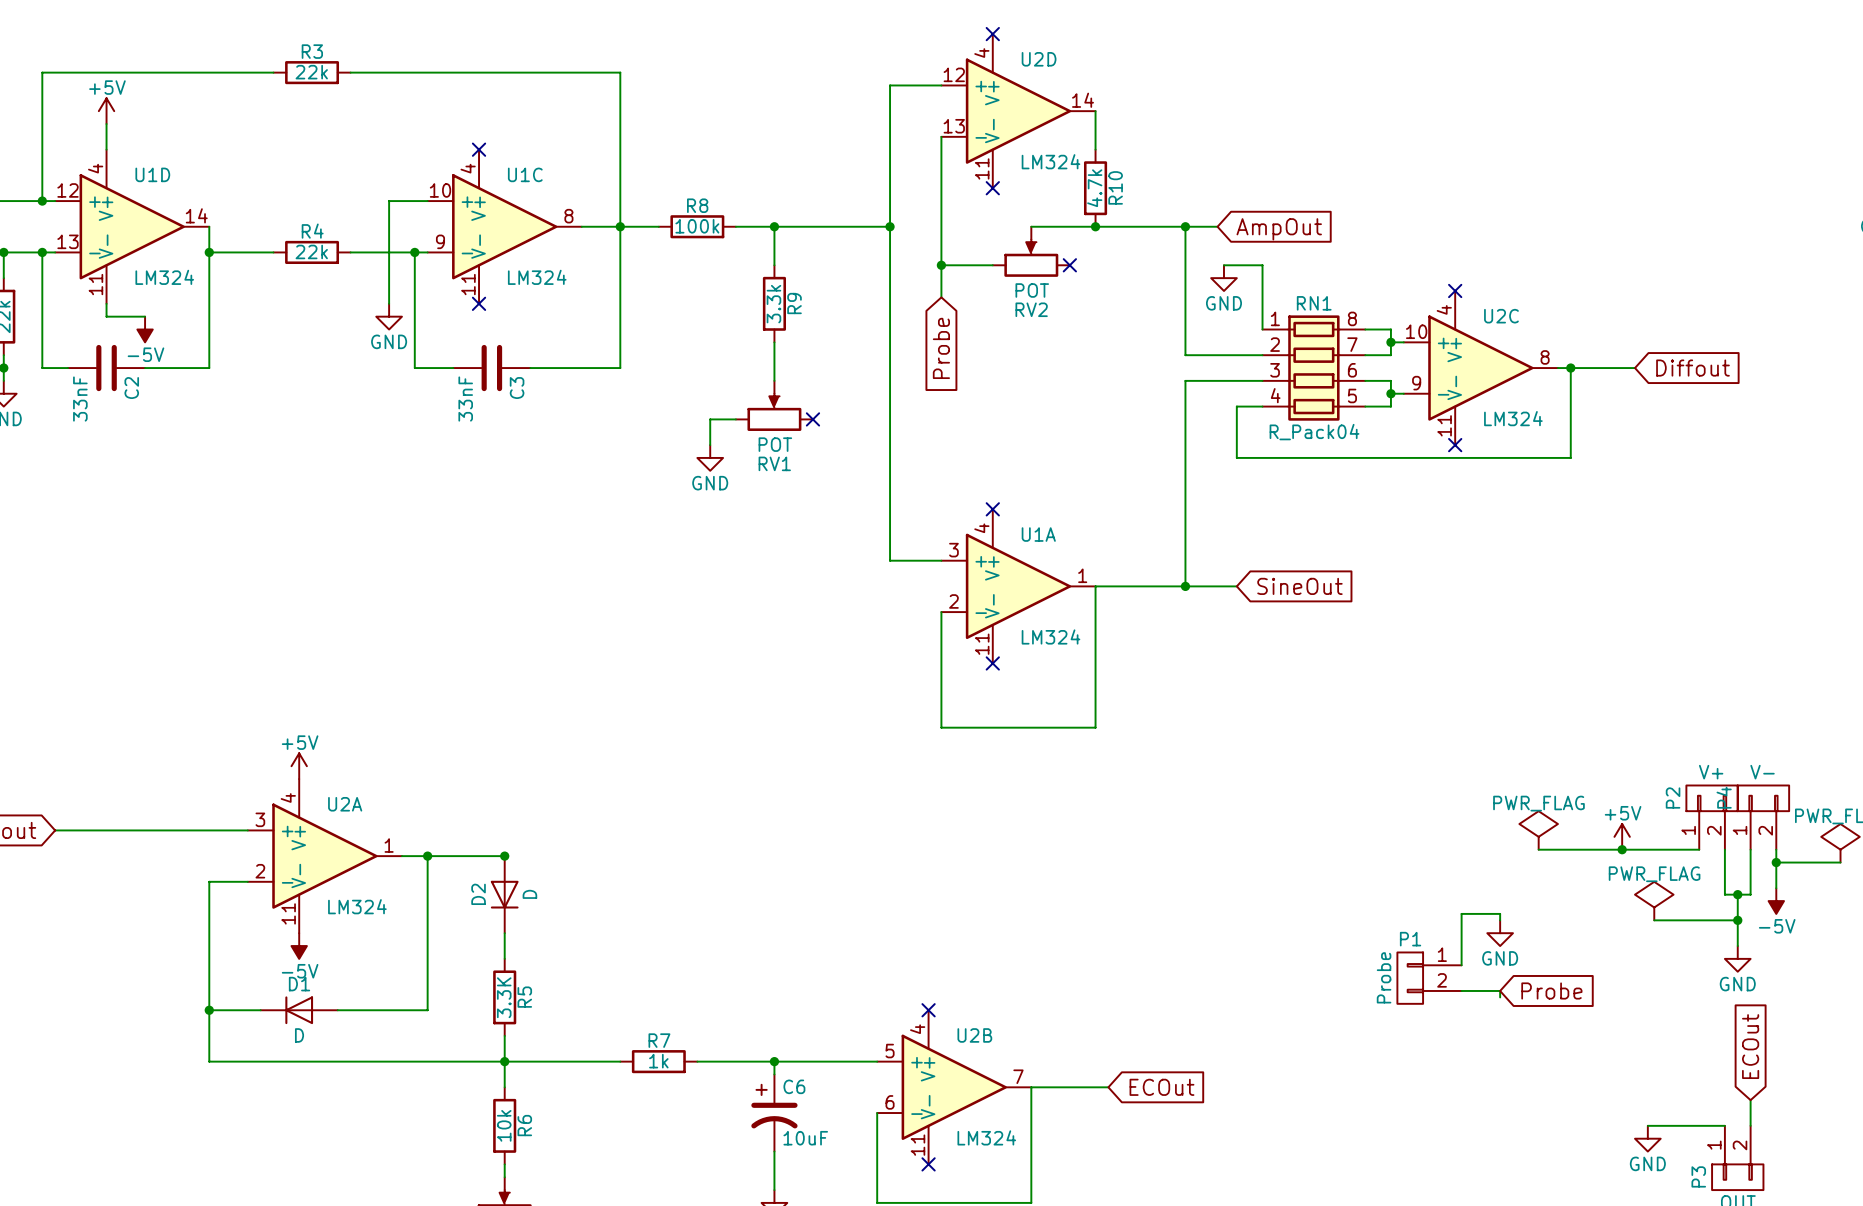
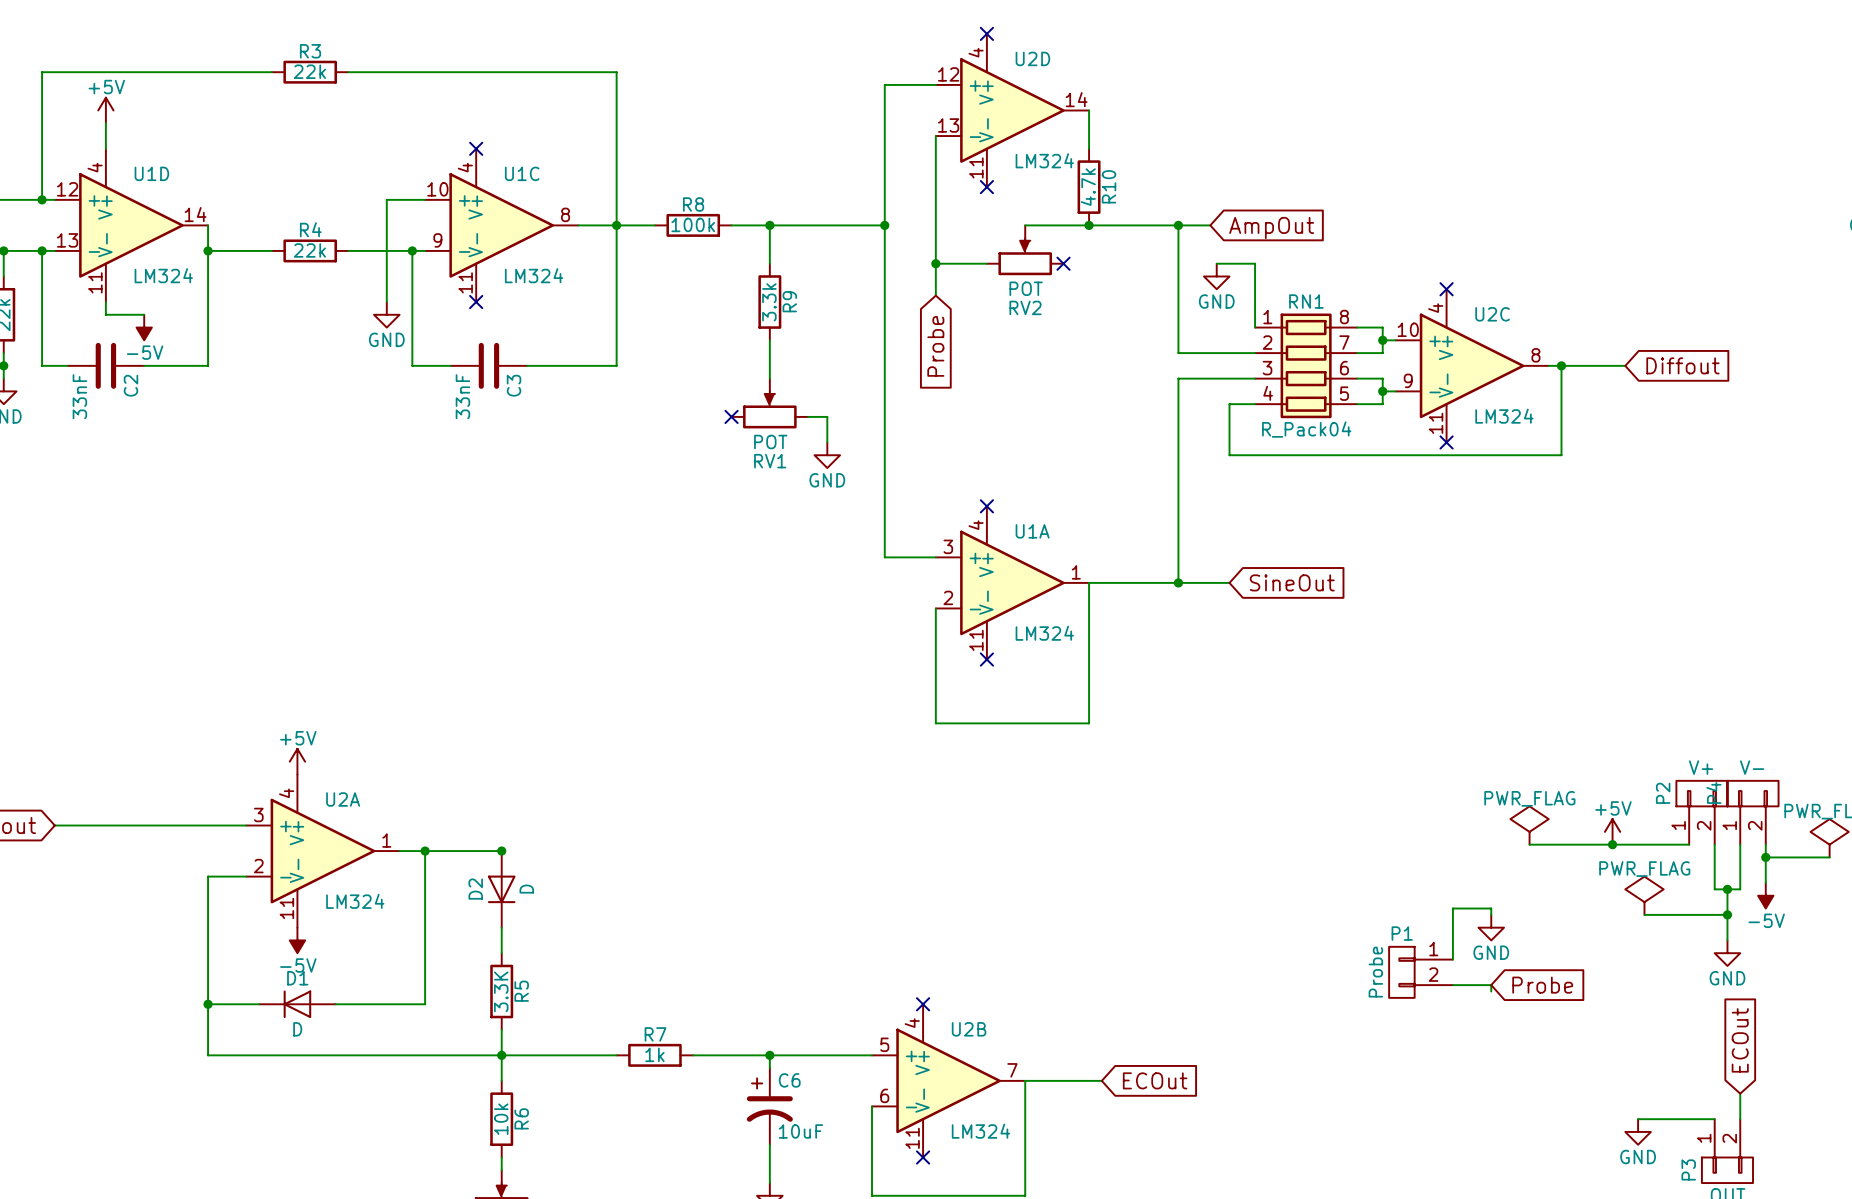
wire: (735, 419) (710, 419) (710, 445) -> none
no-connect mark: none -> (731, 416)
wire: none -> (808, 416) (827, 416) (827, 442)
no-connect mark: (812, 419) -> none
power symbol position: GND (710, 457) -> GND (827, 455)

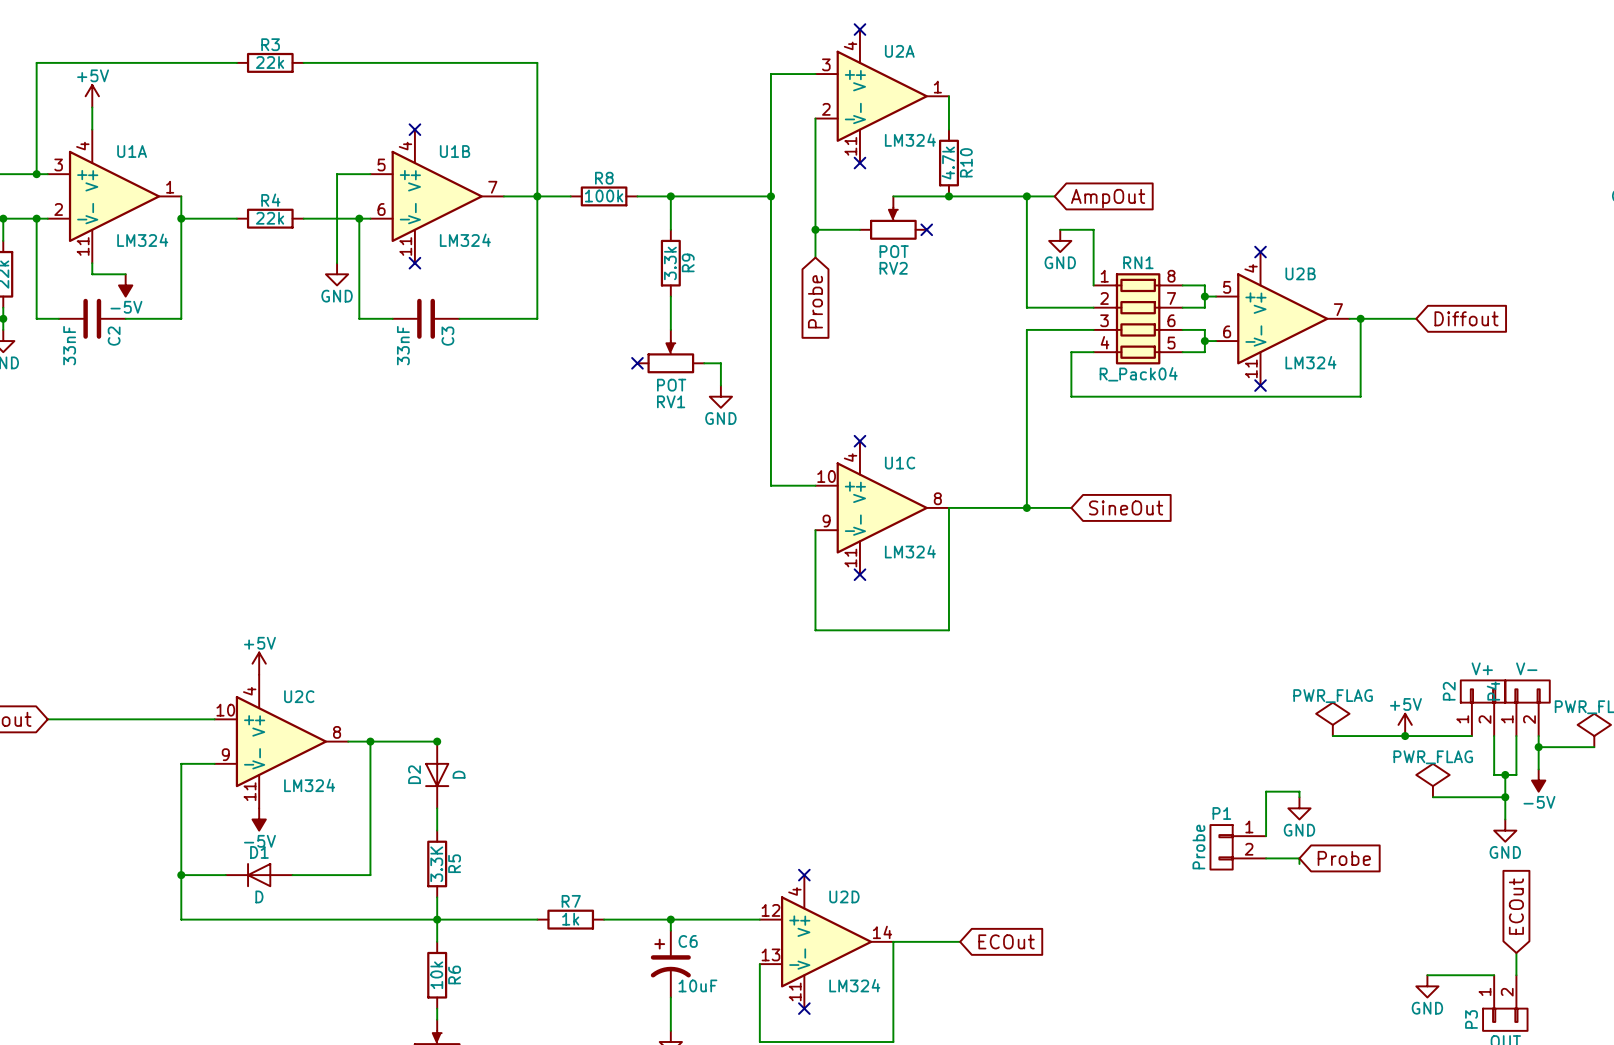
U2D position: (1012, 110) -> (826, 941)
U1D: LM324 (131, 225) -> none
U1C position: (501, 225) -> (882, 507)
U1B: none -> LM324 (437, 196)
U2C position: (1472, 365) -> (281, 741)
U1A position: (1012, 582) -> (114, 196)
U2A position: (322, 851) -> (882, 96)
U2B position: (948, 1080) -> (1282, 318)

